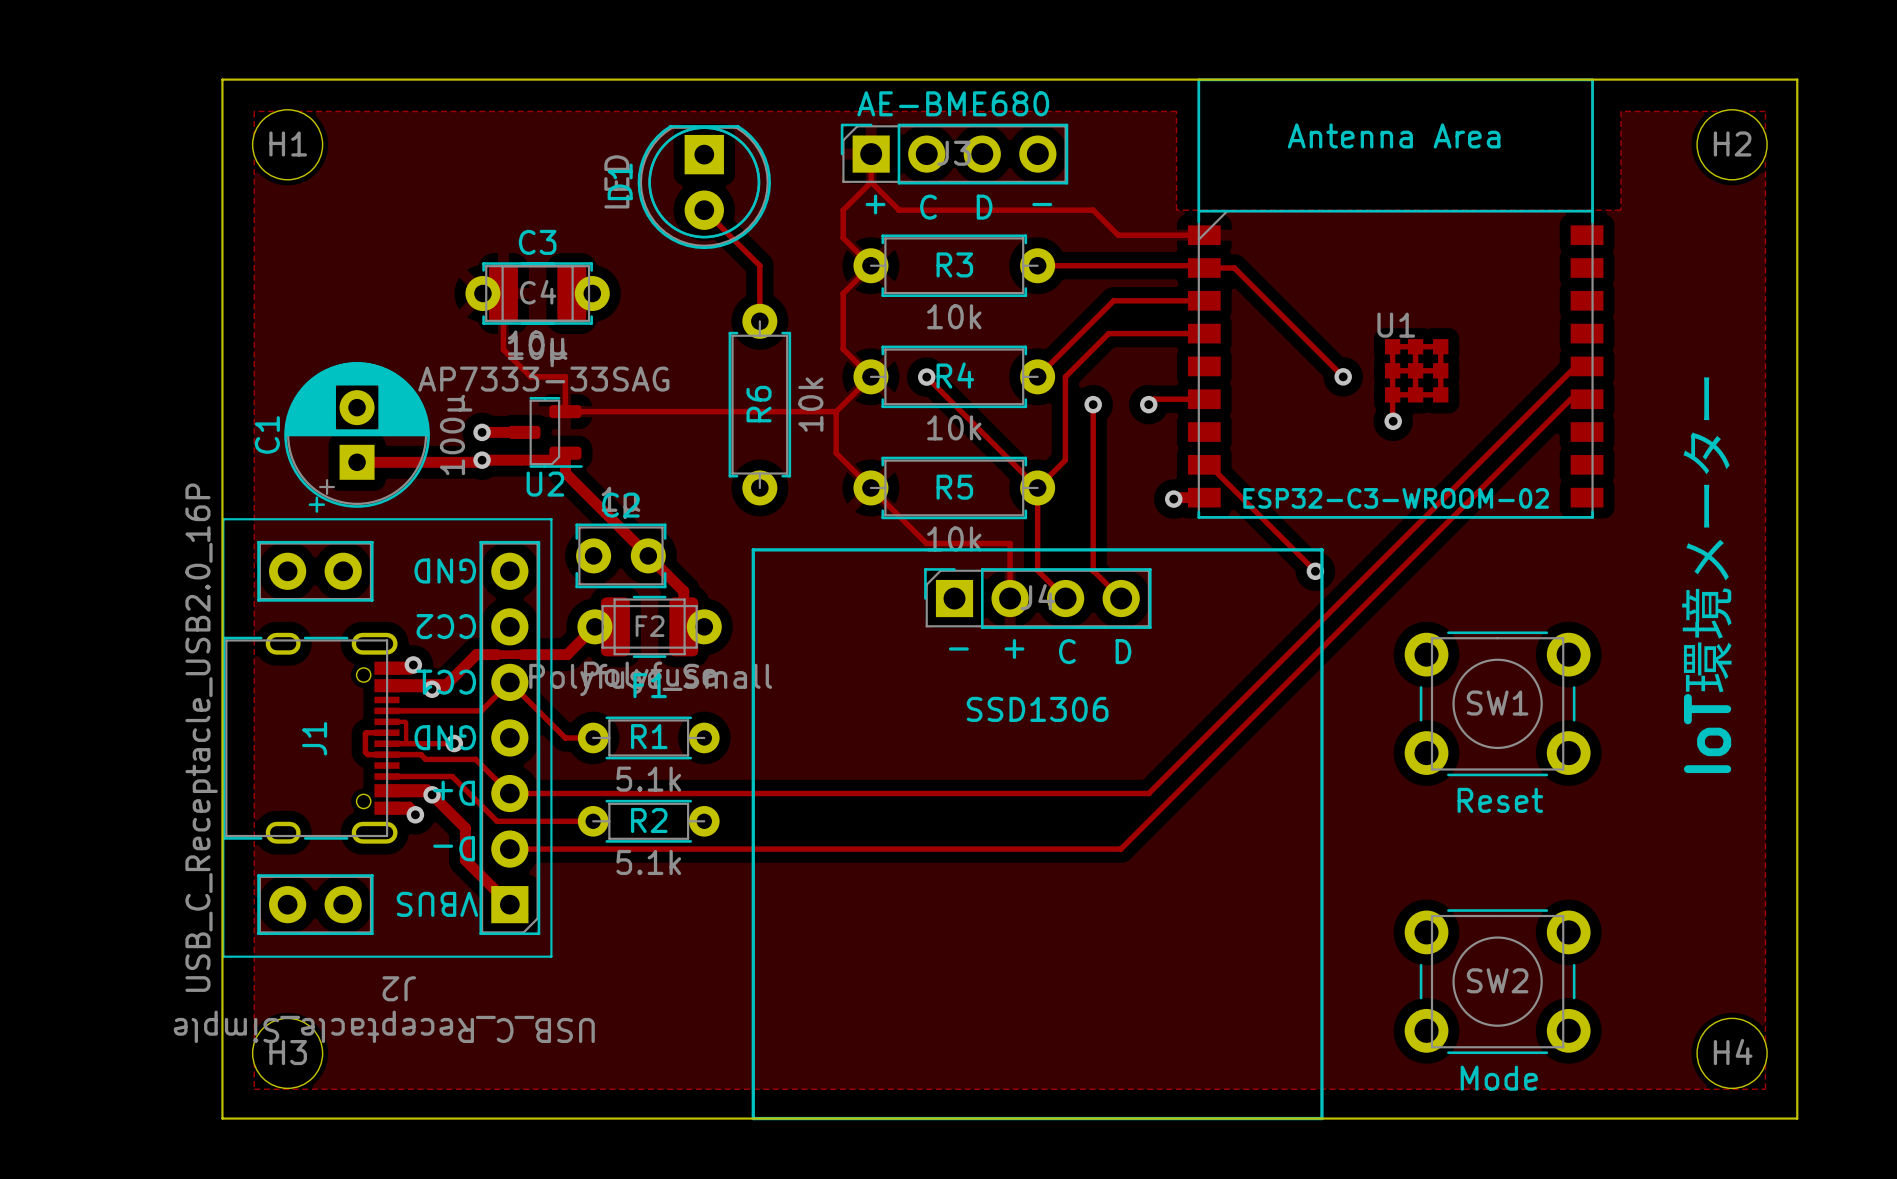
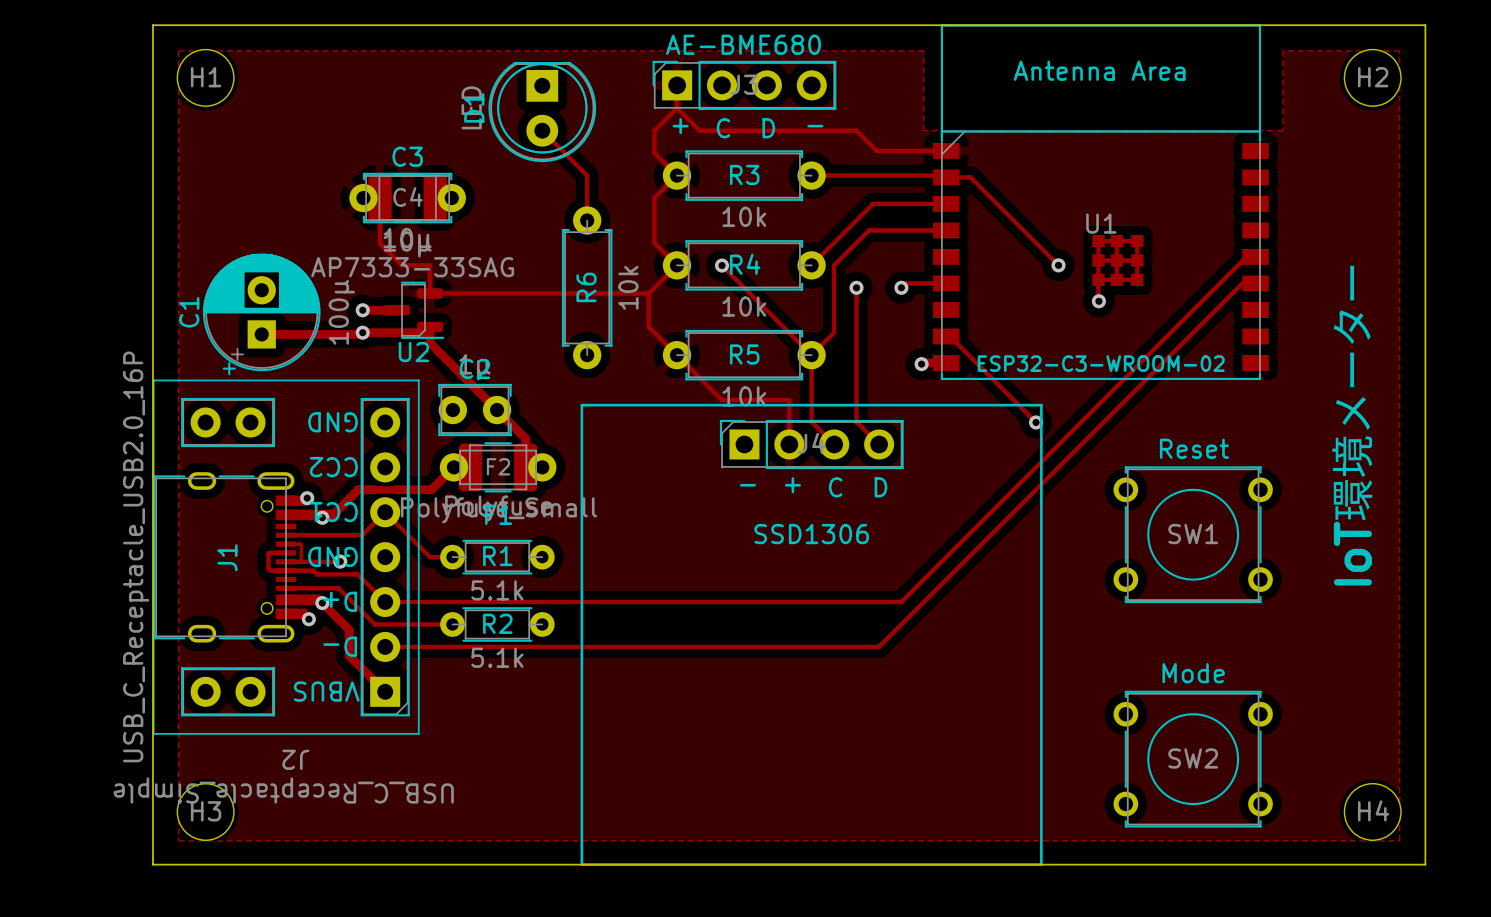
SW1 footprint: [1404, 631, 1591, 777] -> [1113, 466, 1273, 604]
SW1 value position: Reset (1500, 800) -> Reset (1194, 448)
SW2 footprint: [1404, 909, 1591, 1055] -> [1113, 690, 1273, 828]
SW2 value position: Mode (1499, 1078) -> Mode (1193, 673)

